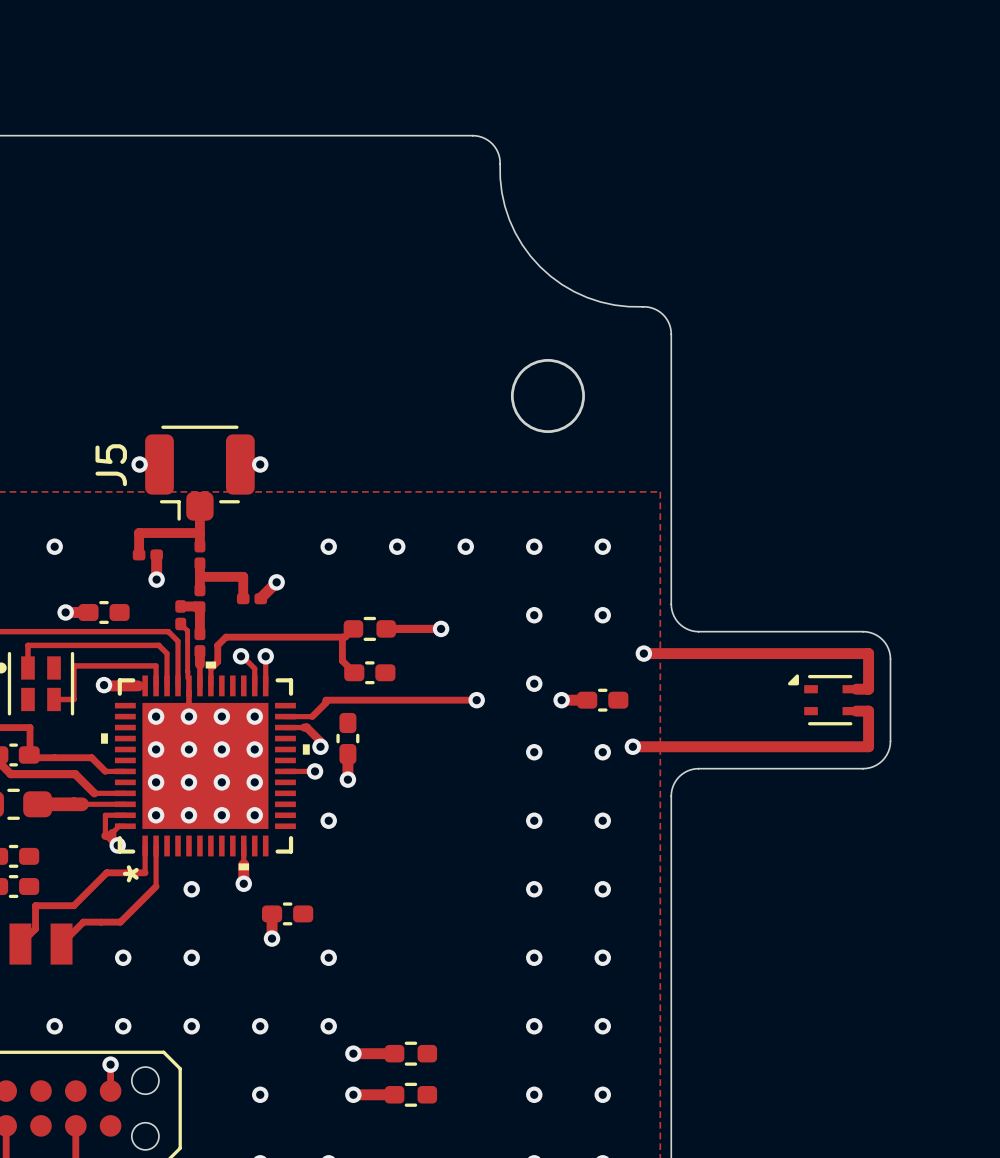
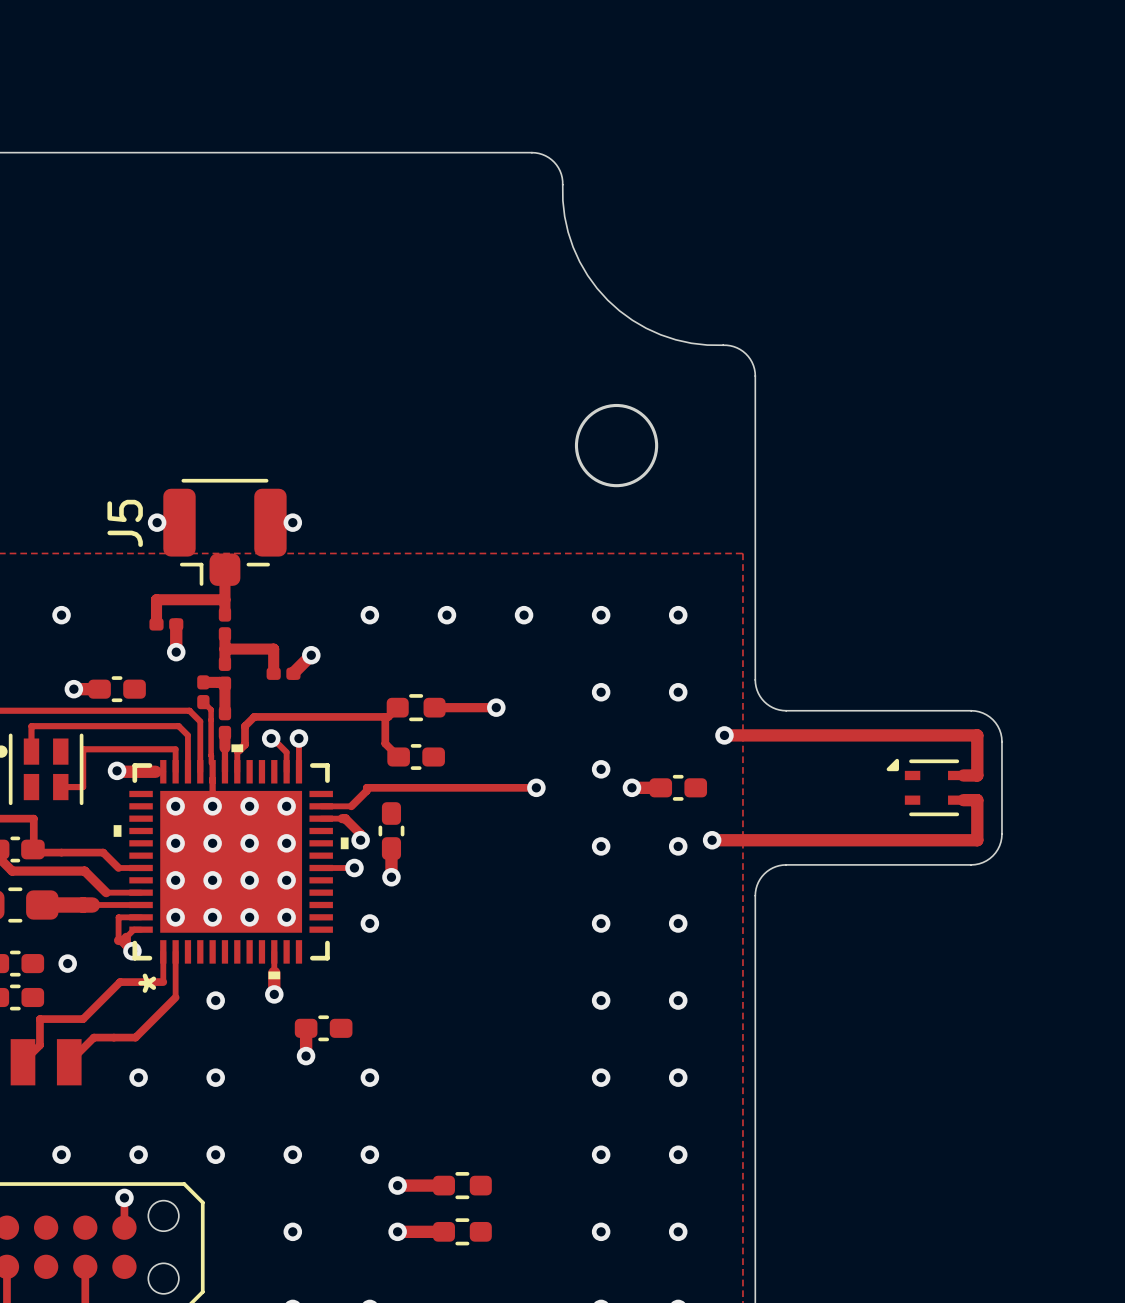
via: none -> (67, 963)

